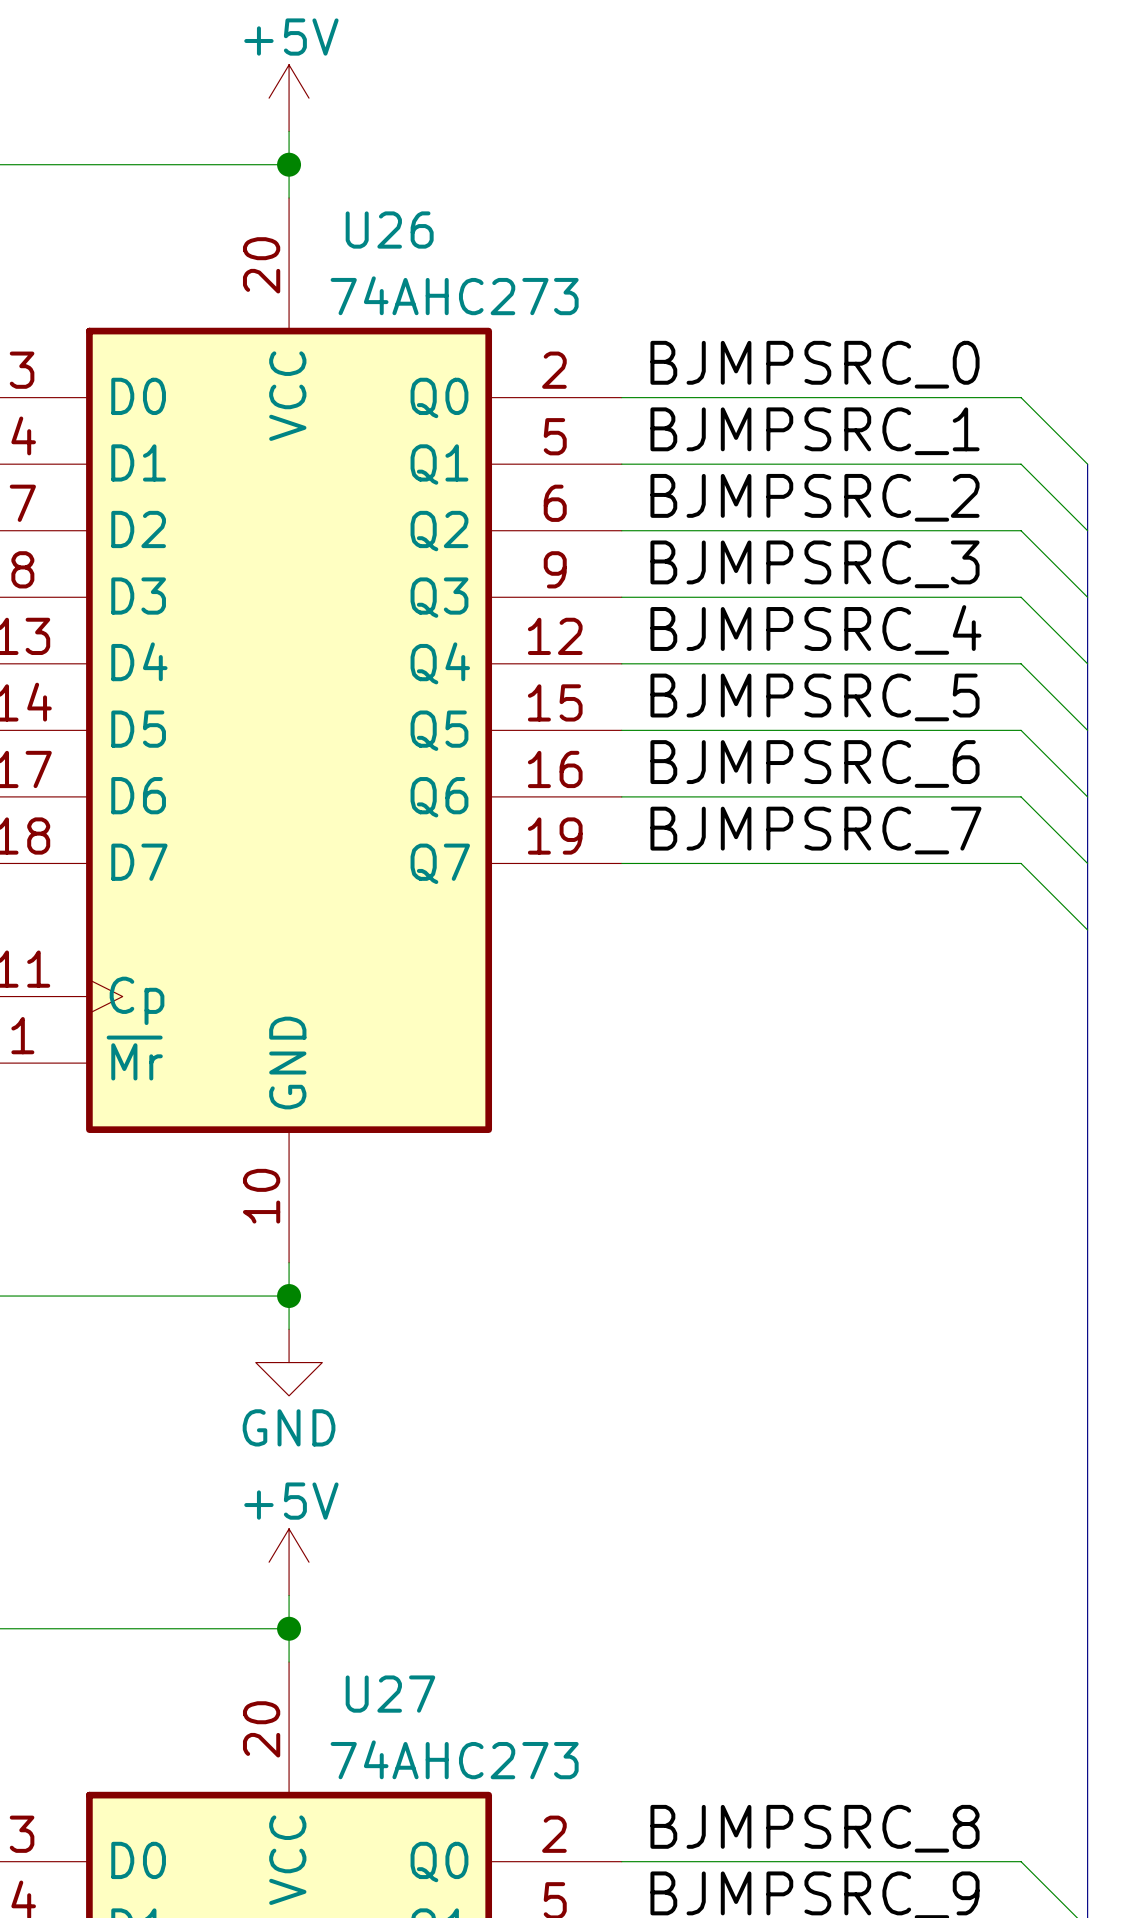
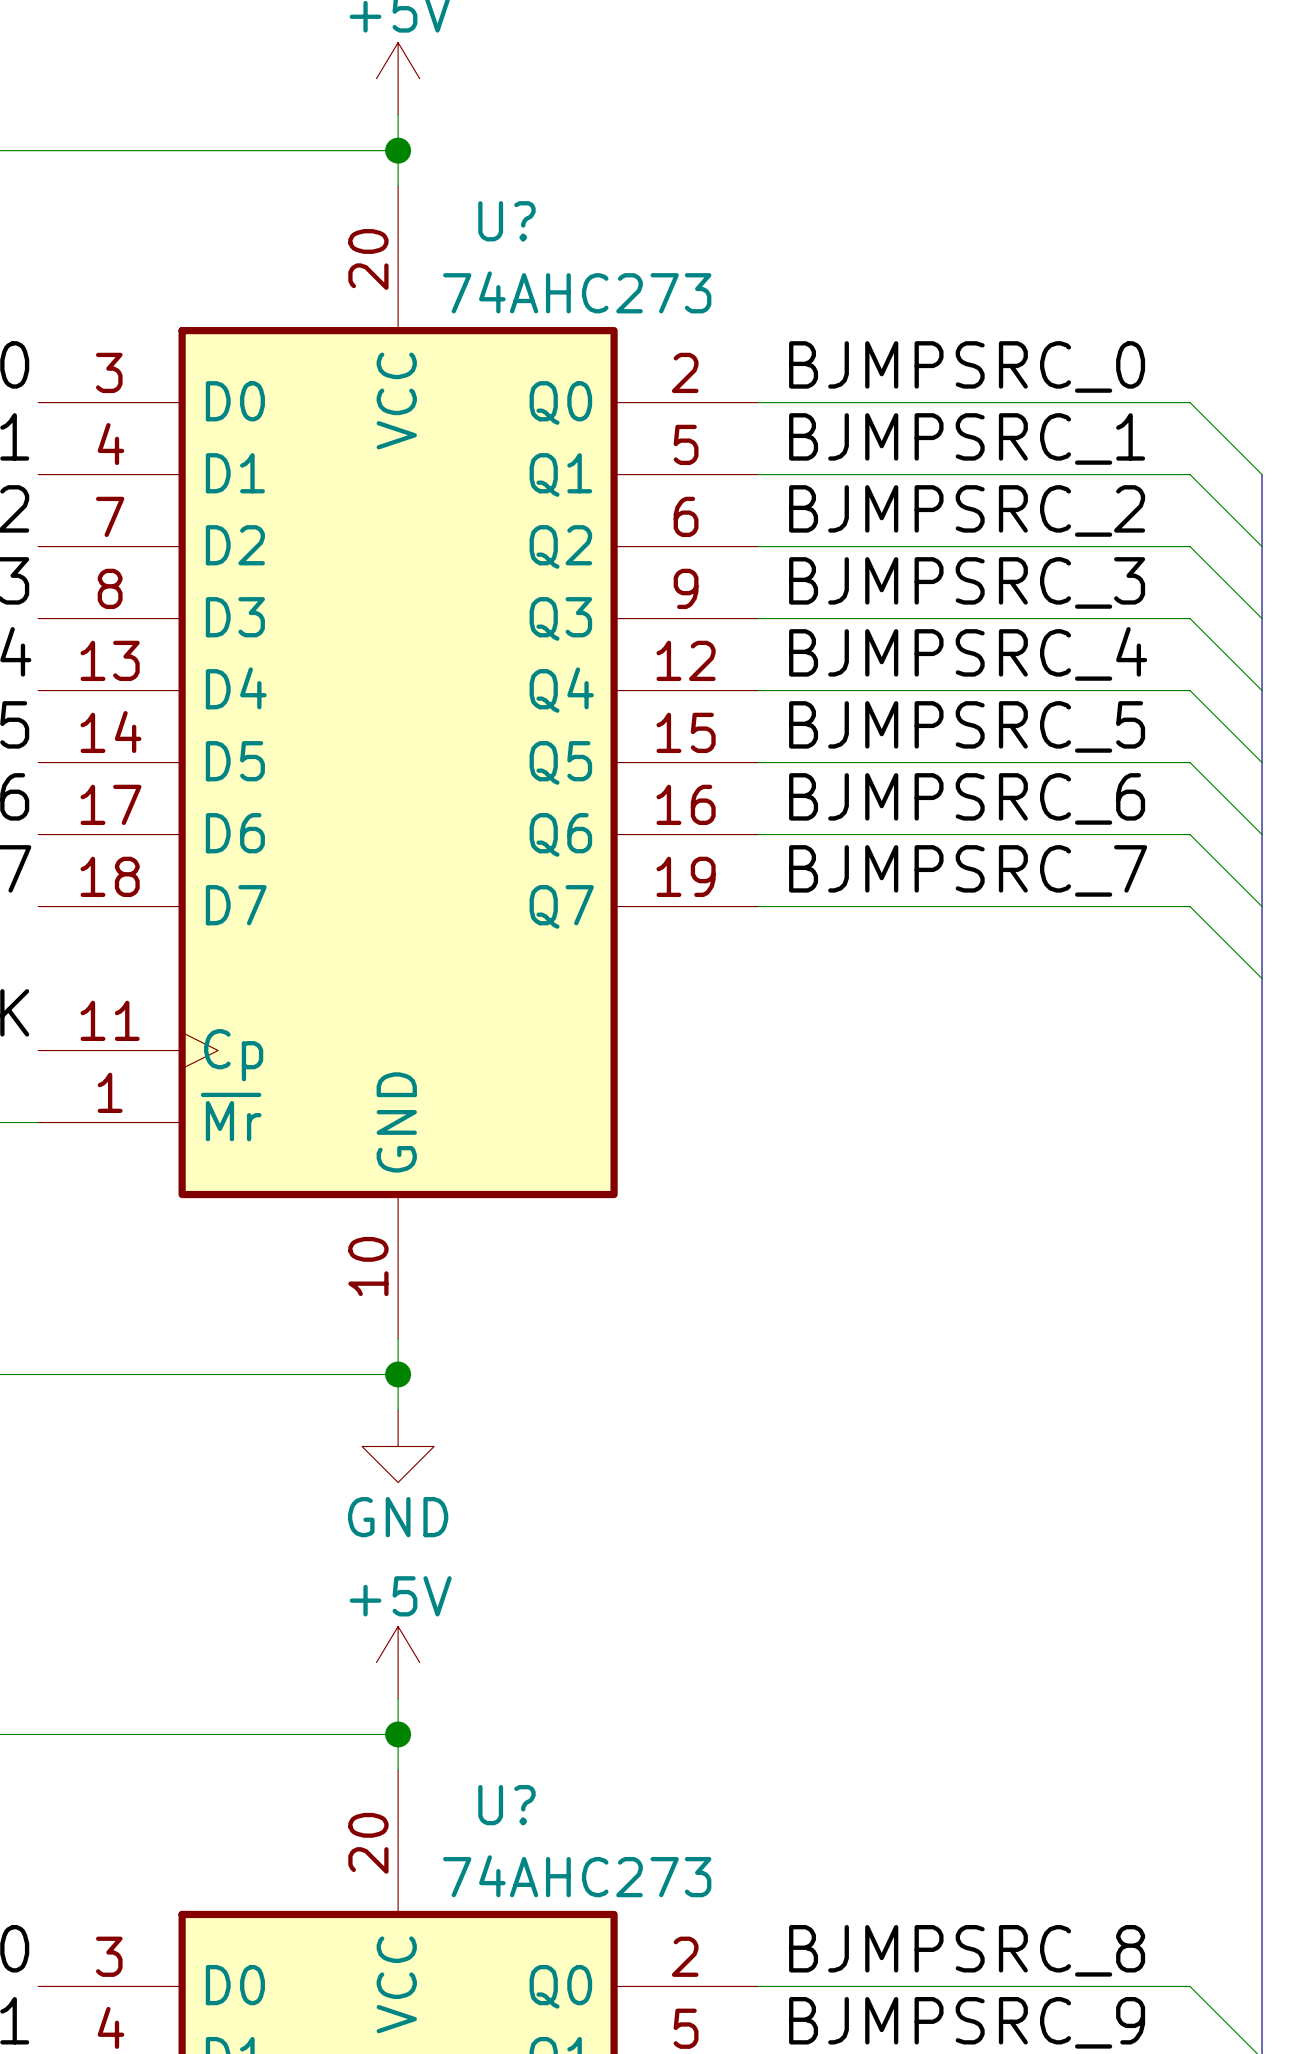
U26 name: U26 (389, 230) -> U? (506, 221)
U27 name: U27 (390, 1694) -> U? (506, 1805)

